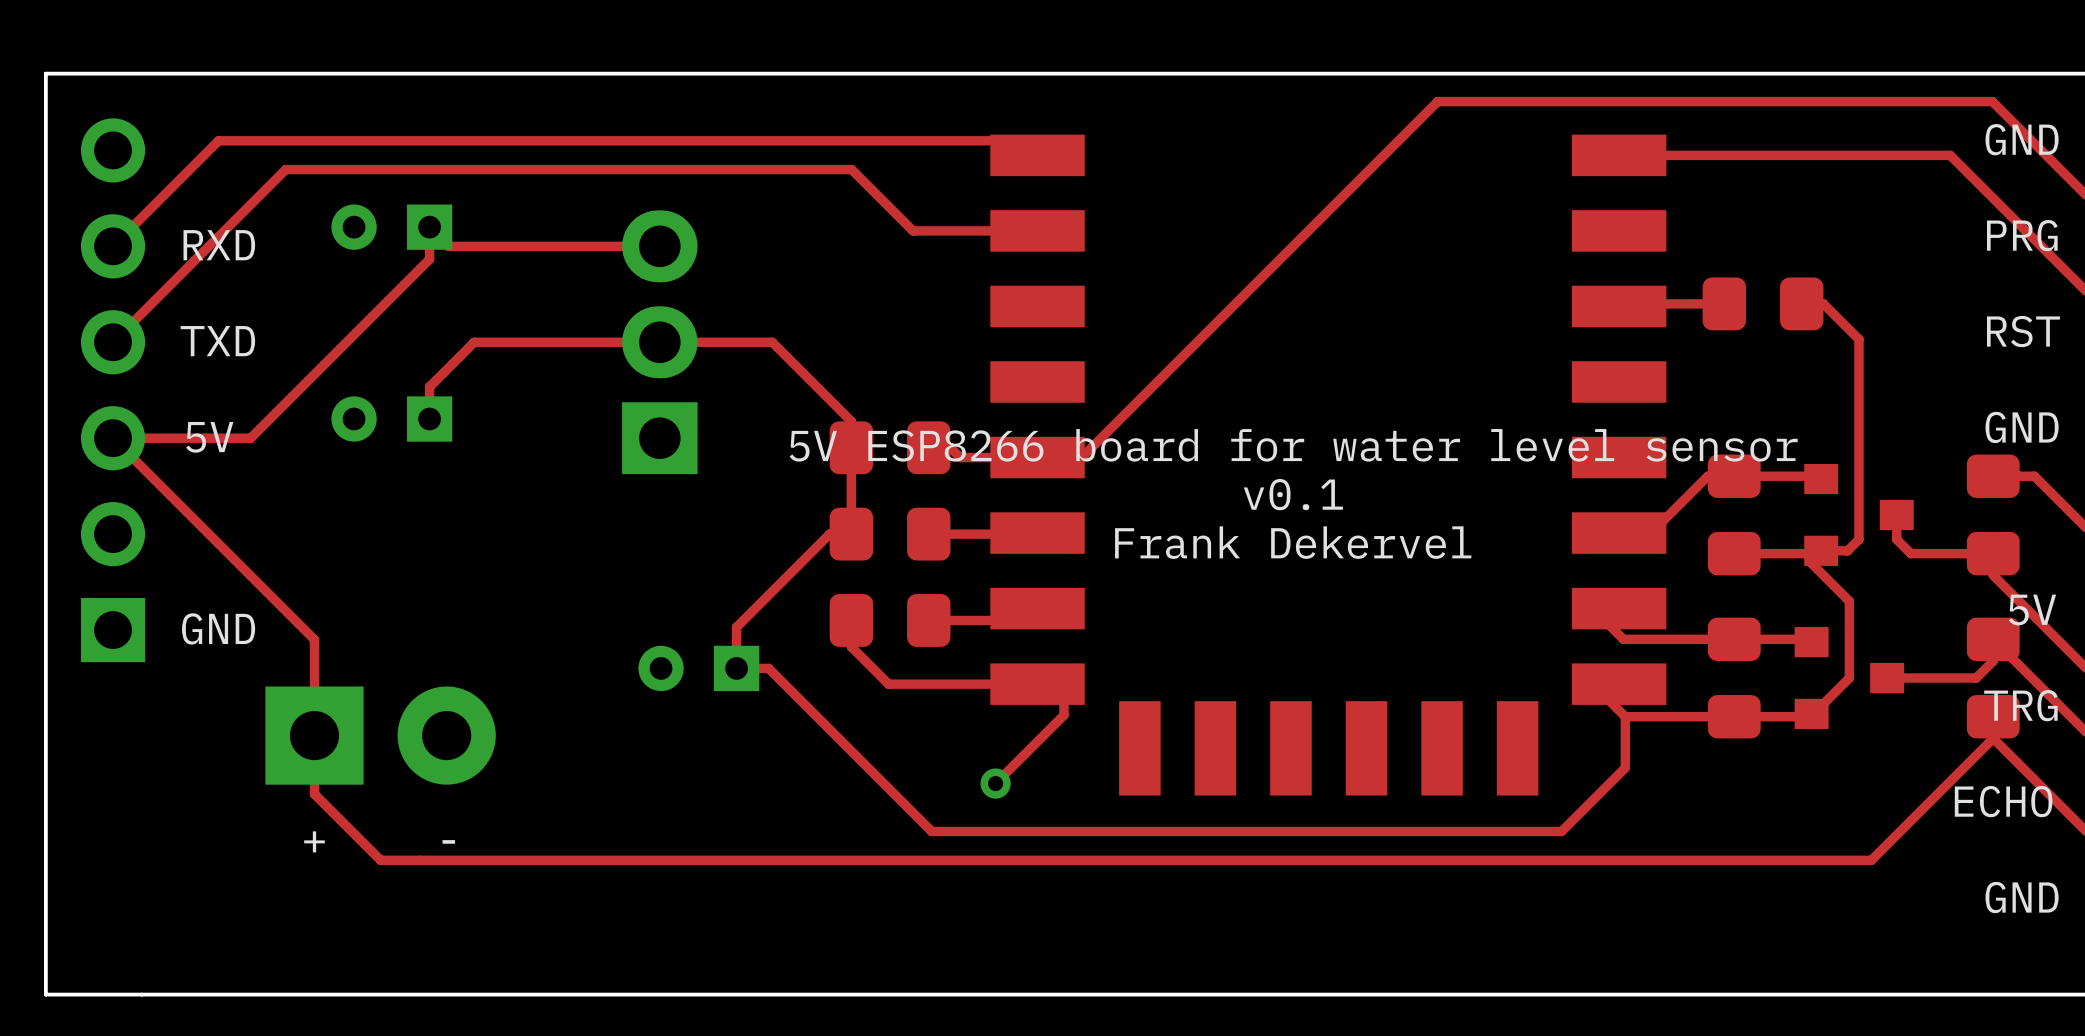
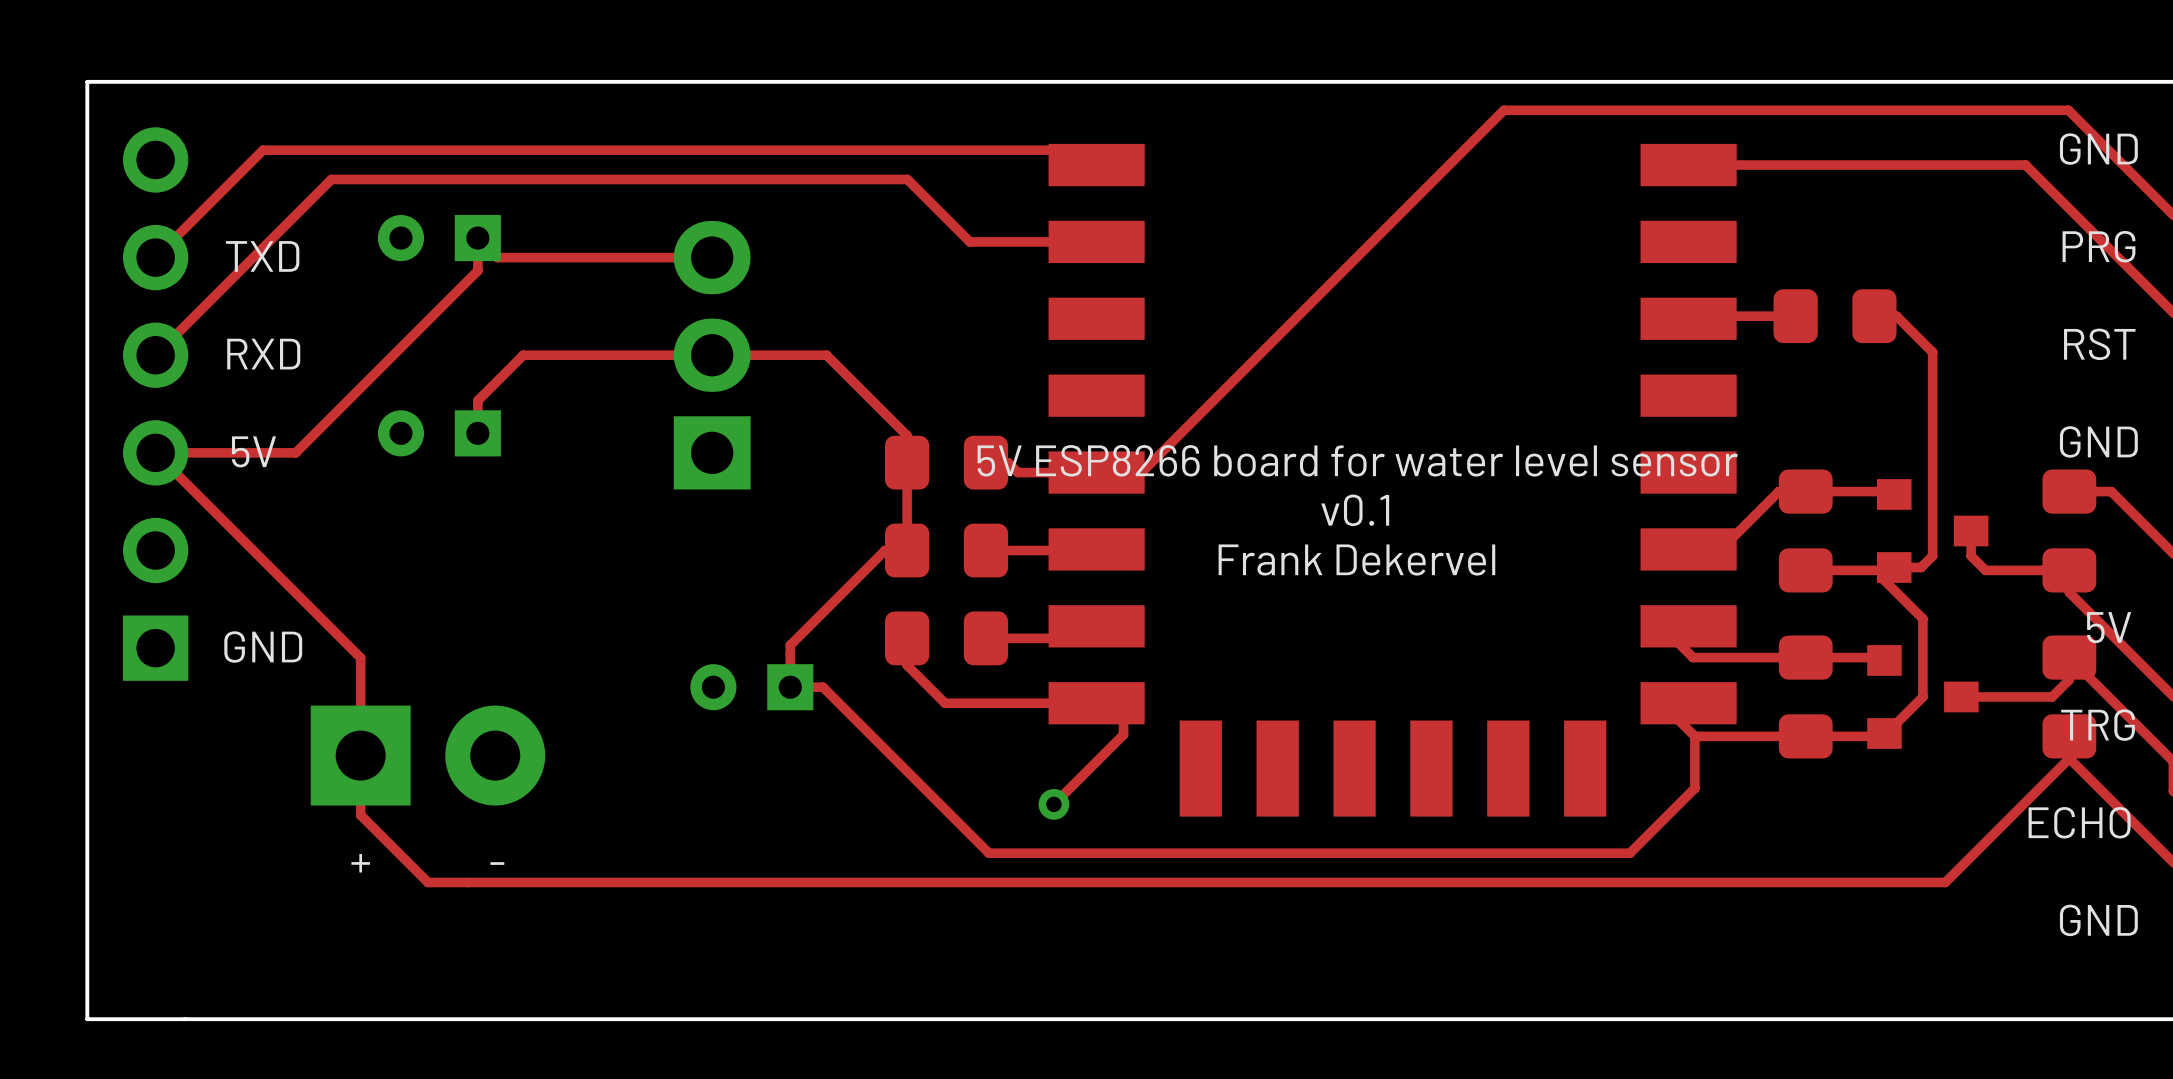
text: RXD (219, 245) -> TXD (262, 256)
text: TXD (217, 341) -> RXD (263, 354)

